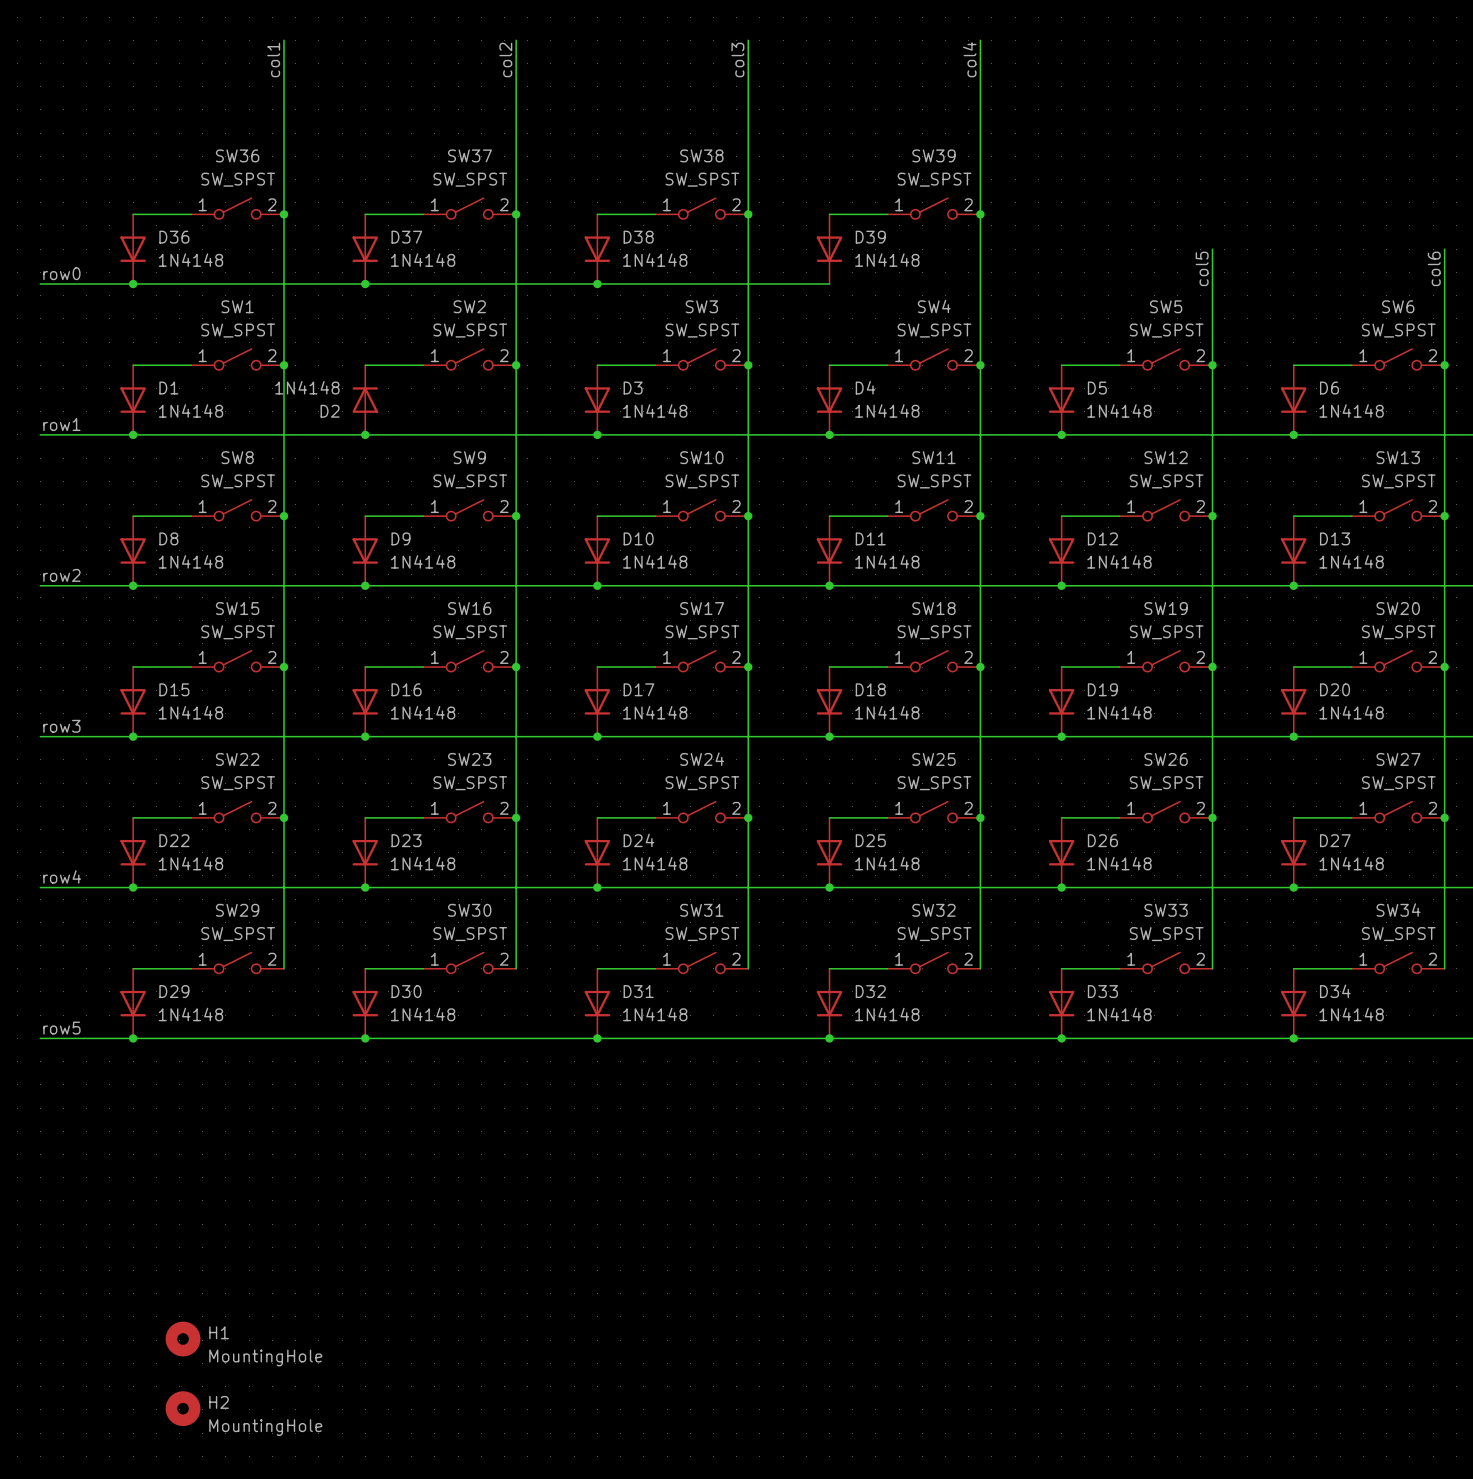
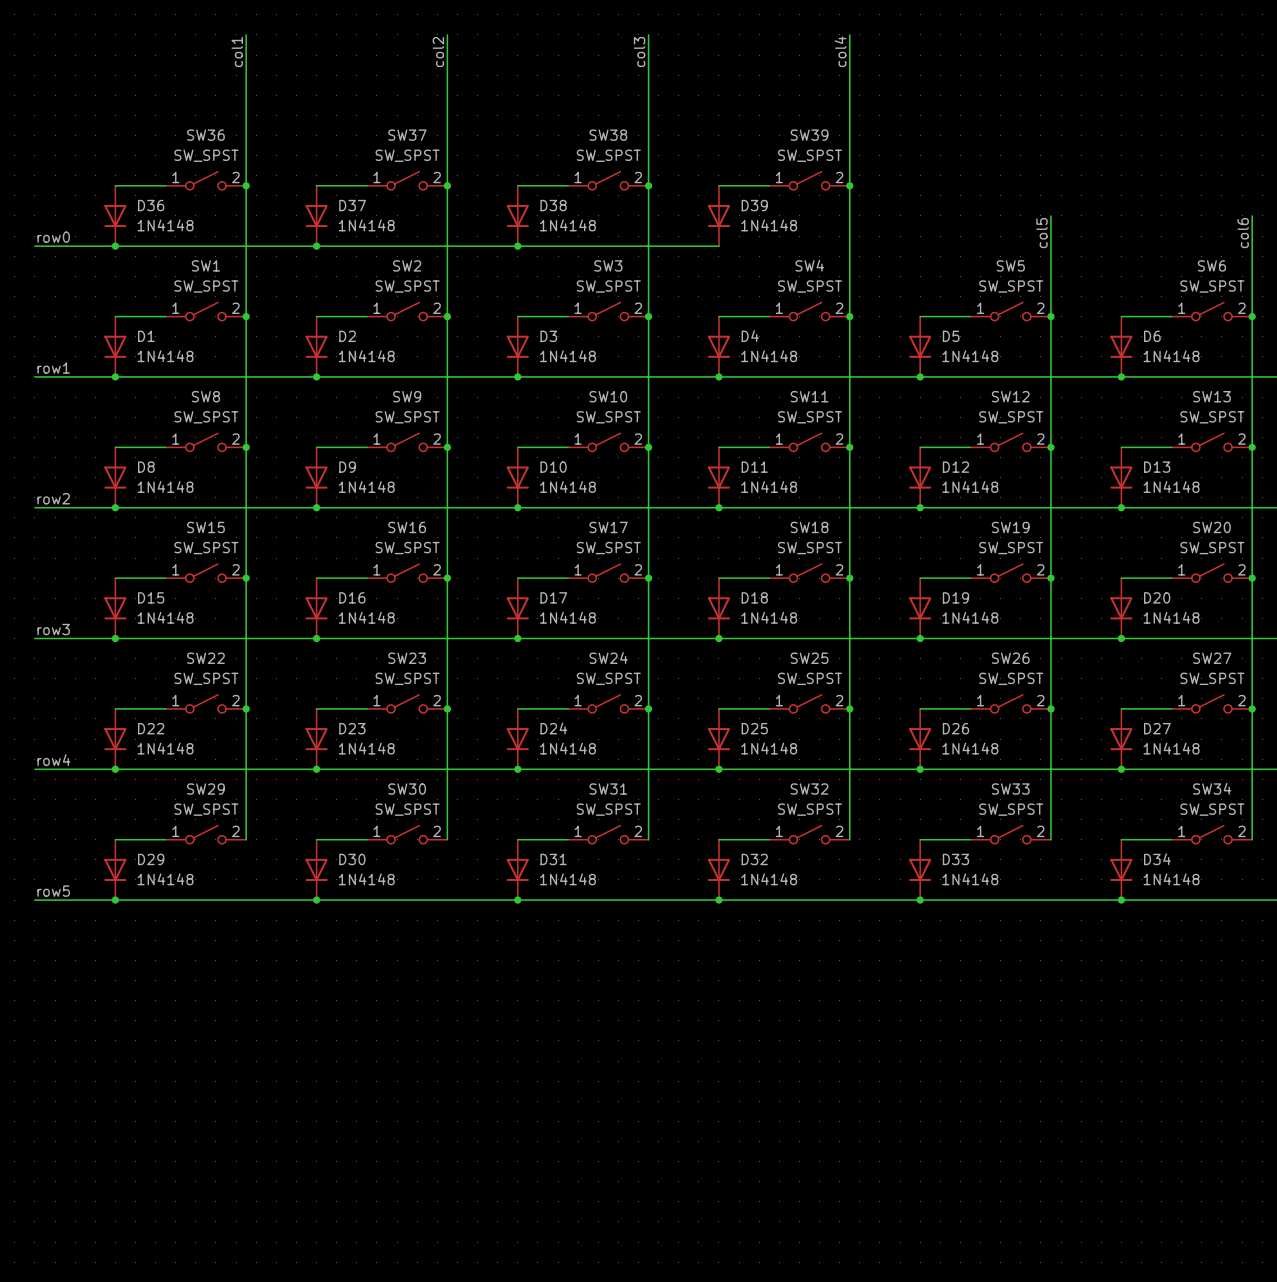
D2 rotation: 0° (365, 400) -> 180° (316, 346)
H1: MountingHole (183, 1339) -> none
H2: MountingHole (183, 1408) -> none

